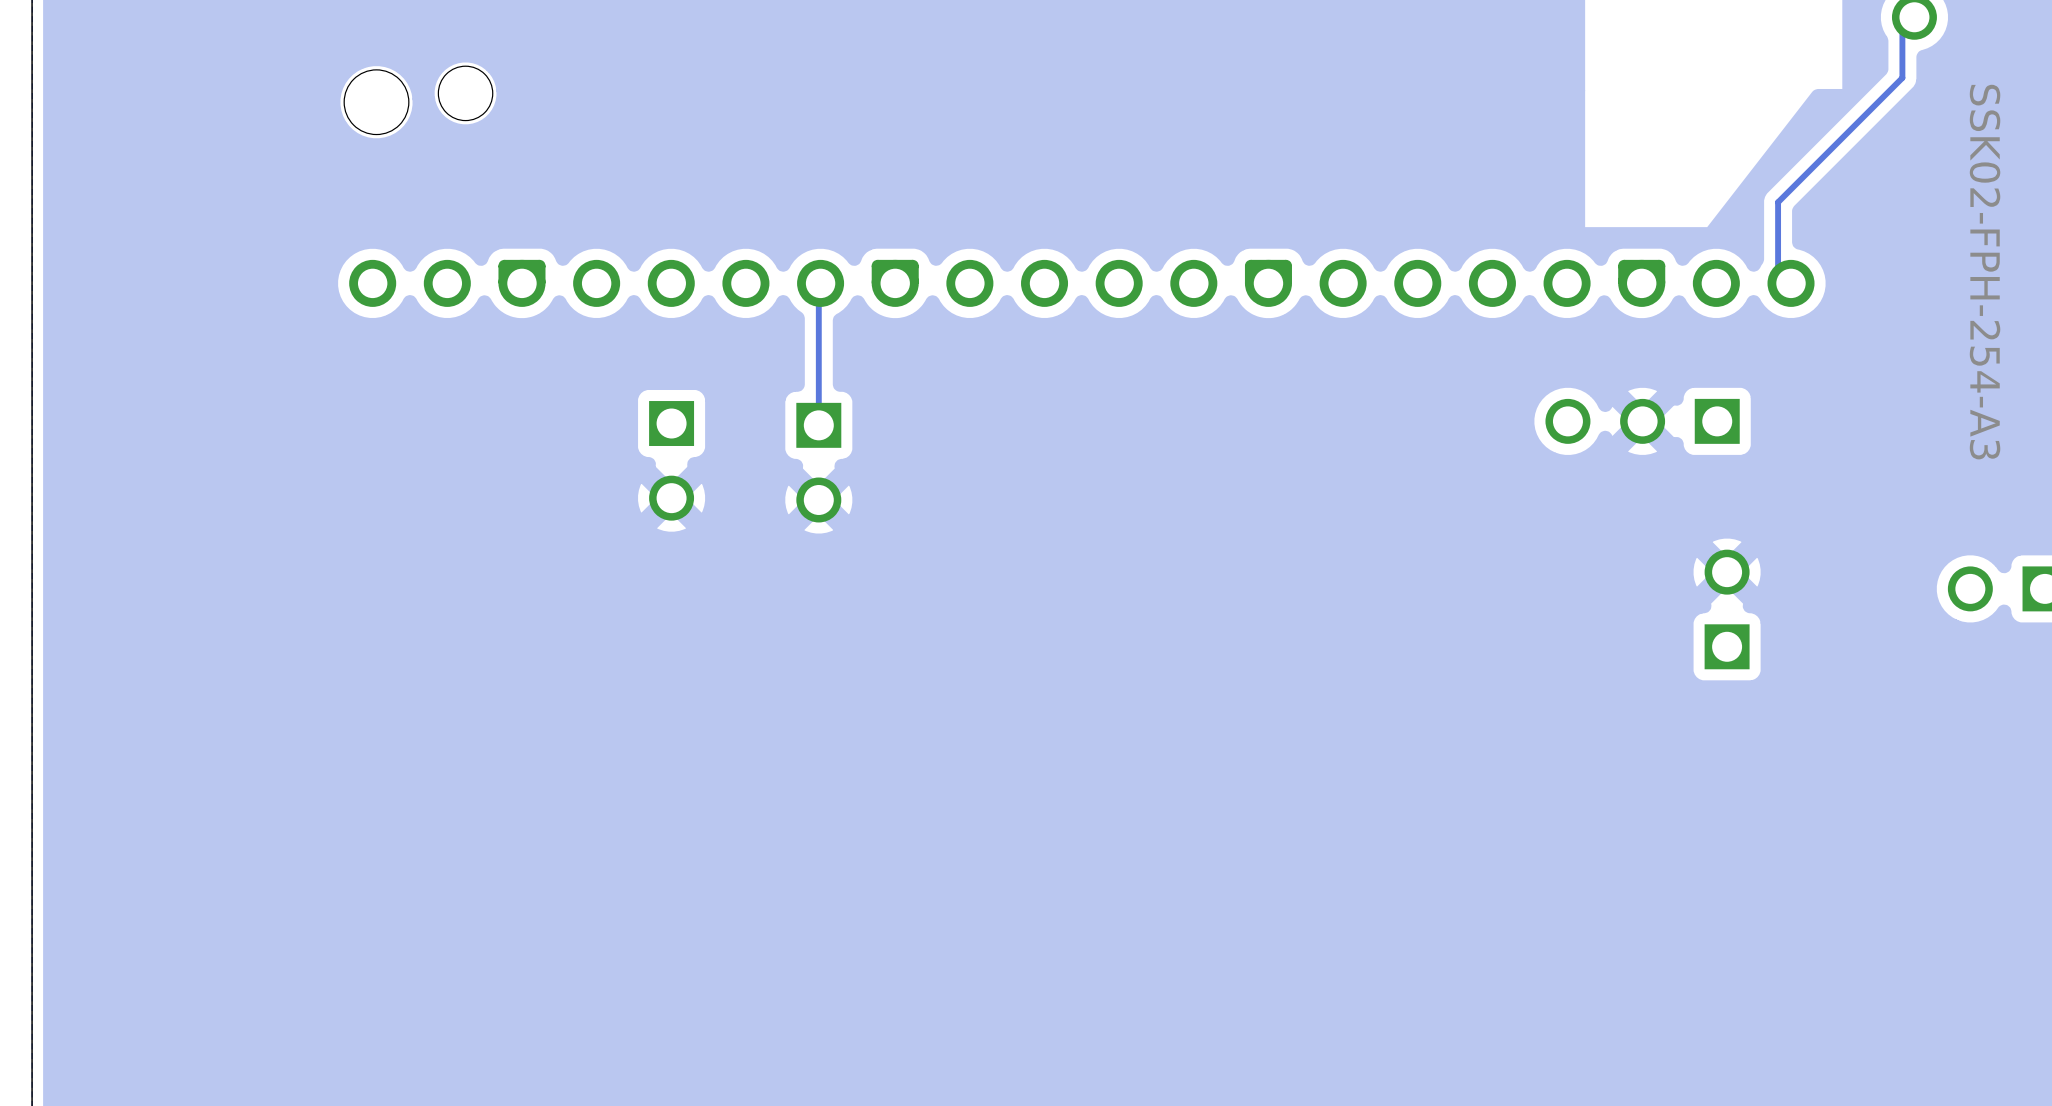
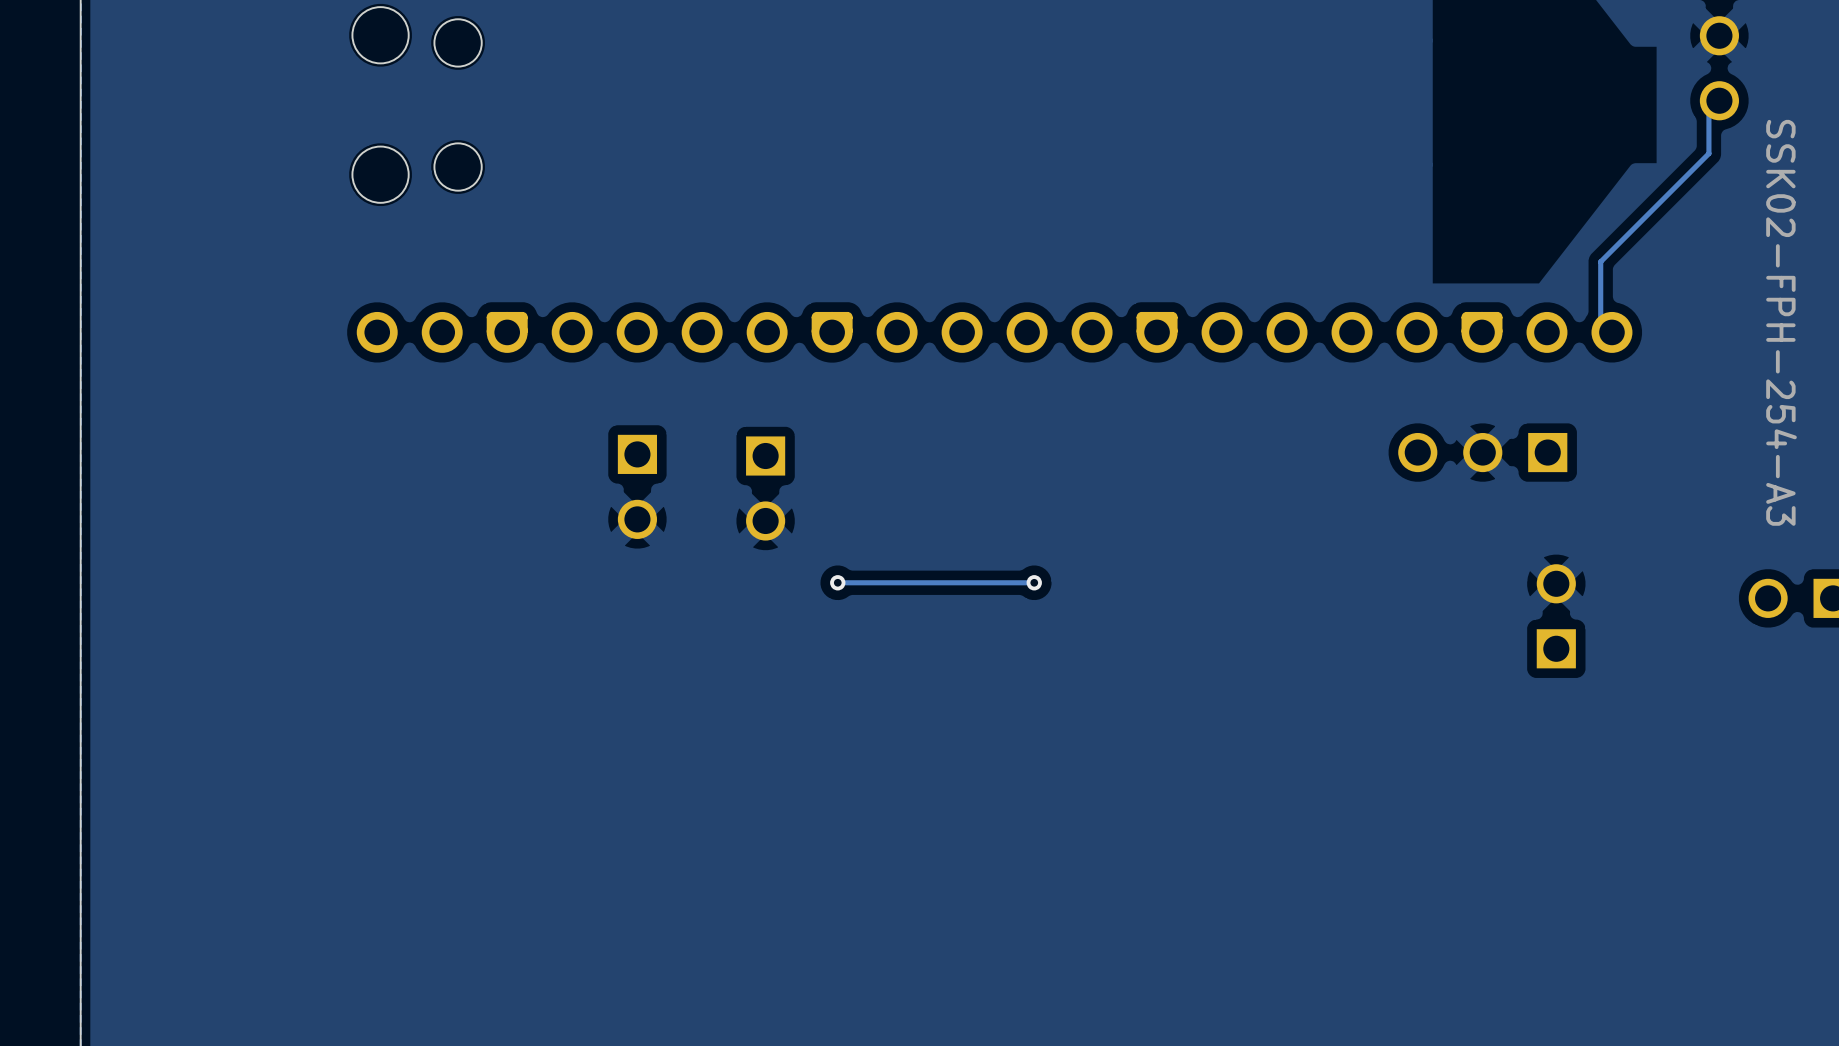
track: (818, 285) (818, 425) -> none
via: none -> (837, 582)
track: none -> (1034, 582) (837, 582)
via: none -> (1034, 582)

